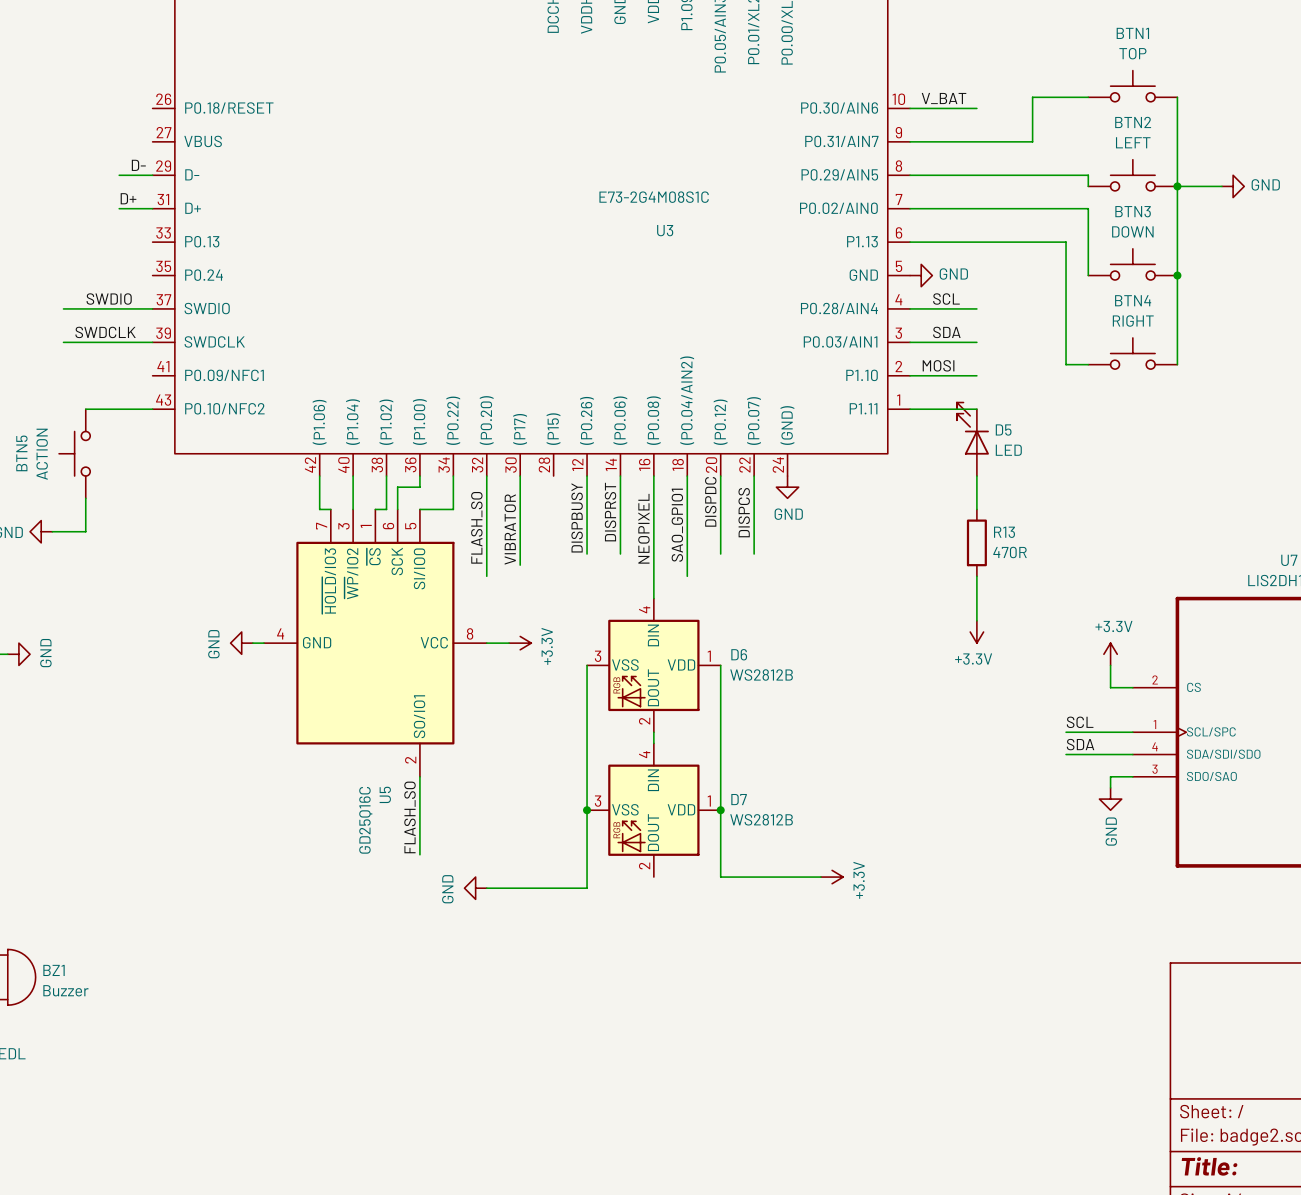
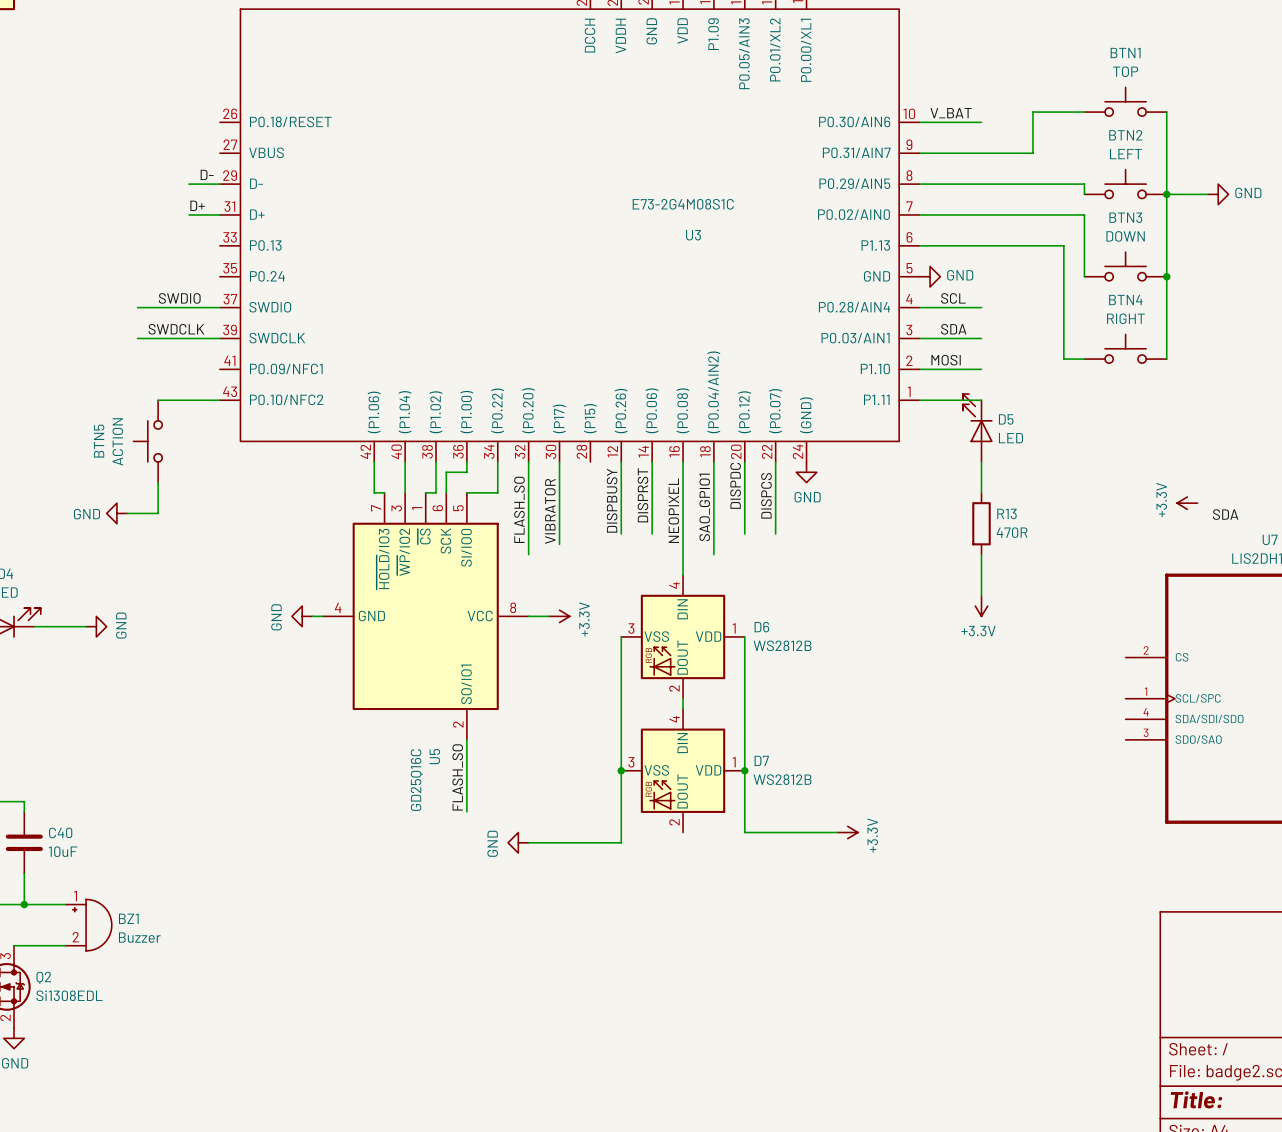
power symbol: none -> +3.3V (1187, 503)
label: none -> SDA (1225, 514)
power symbol: +3.3V (1110, 654) -> none
wire: (1110, 665) (1110, 687) (1132, 687) -> none
label: SCL (1080, 722) -> none
wire: (1066, 732) (1132, 732) -> none
label: SDA (1080, 744) -> none
wire: (1066, 754) (1132, 754) -> none
wire: (1132, 776) (1110, 776) (1110, 787) -> none
power symbol: GND (1110, 799) -> none

